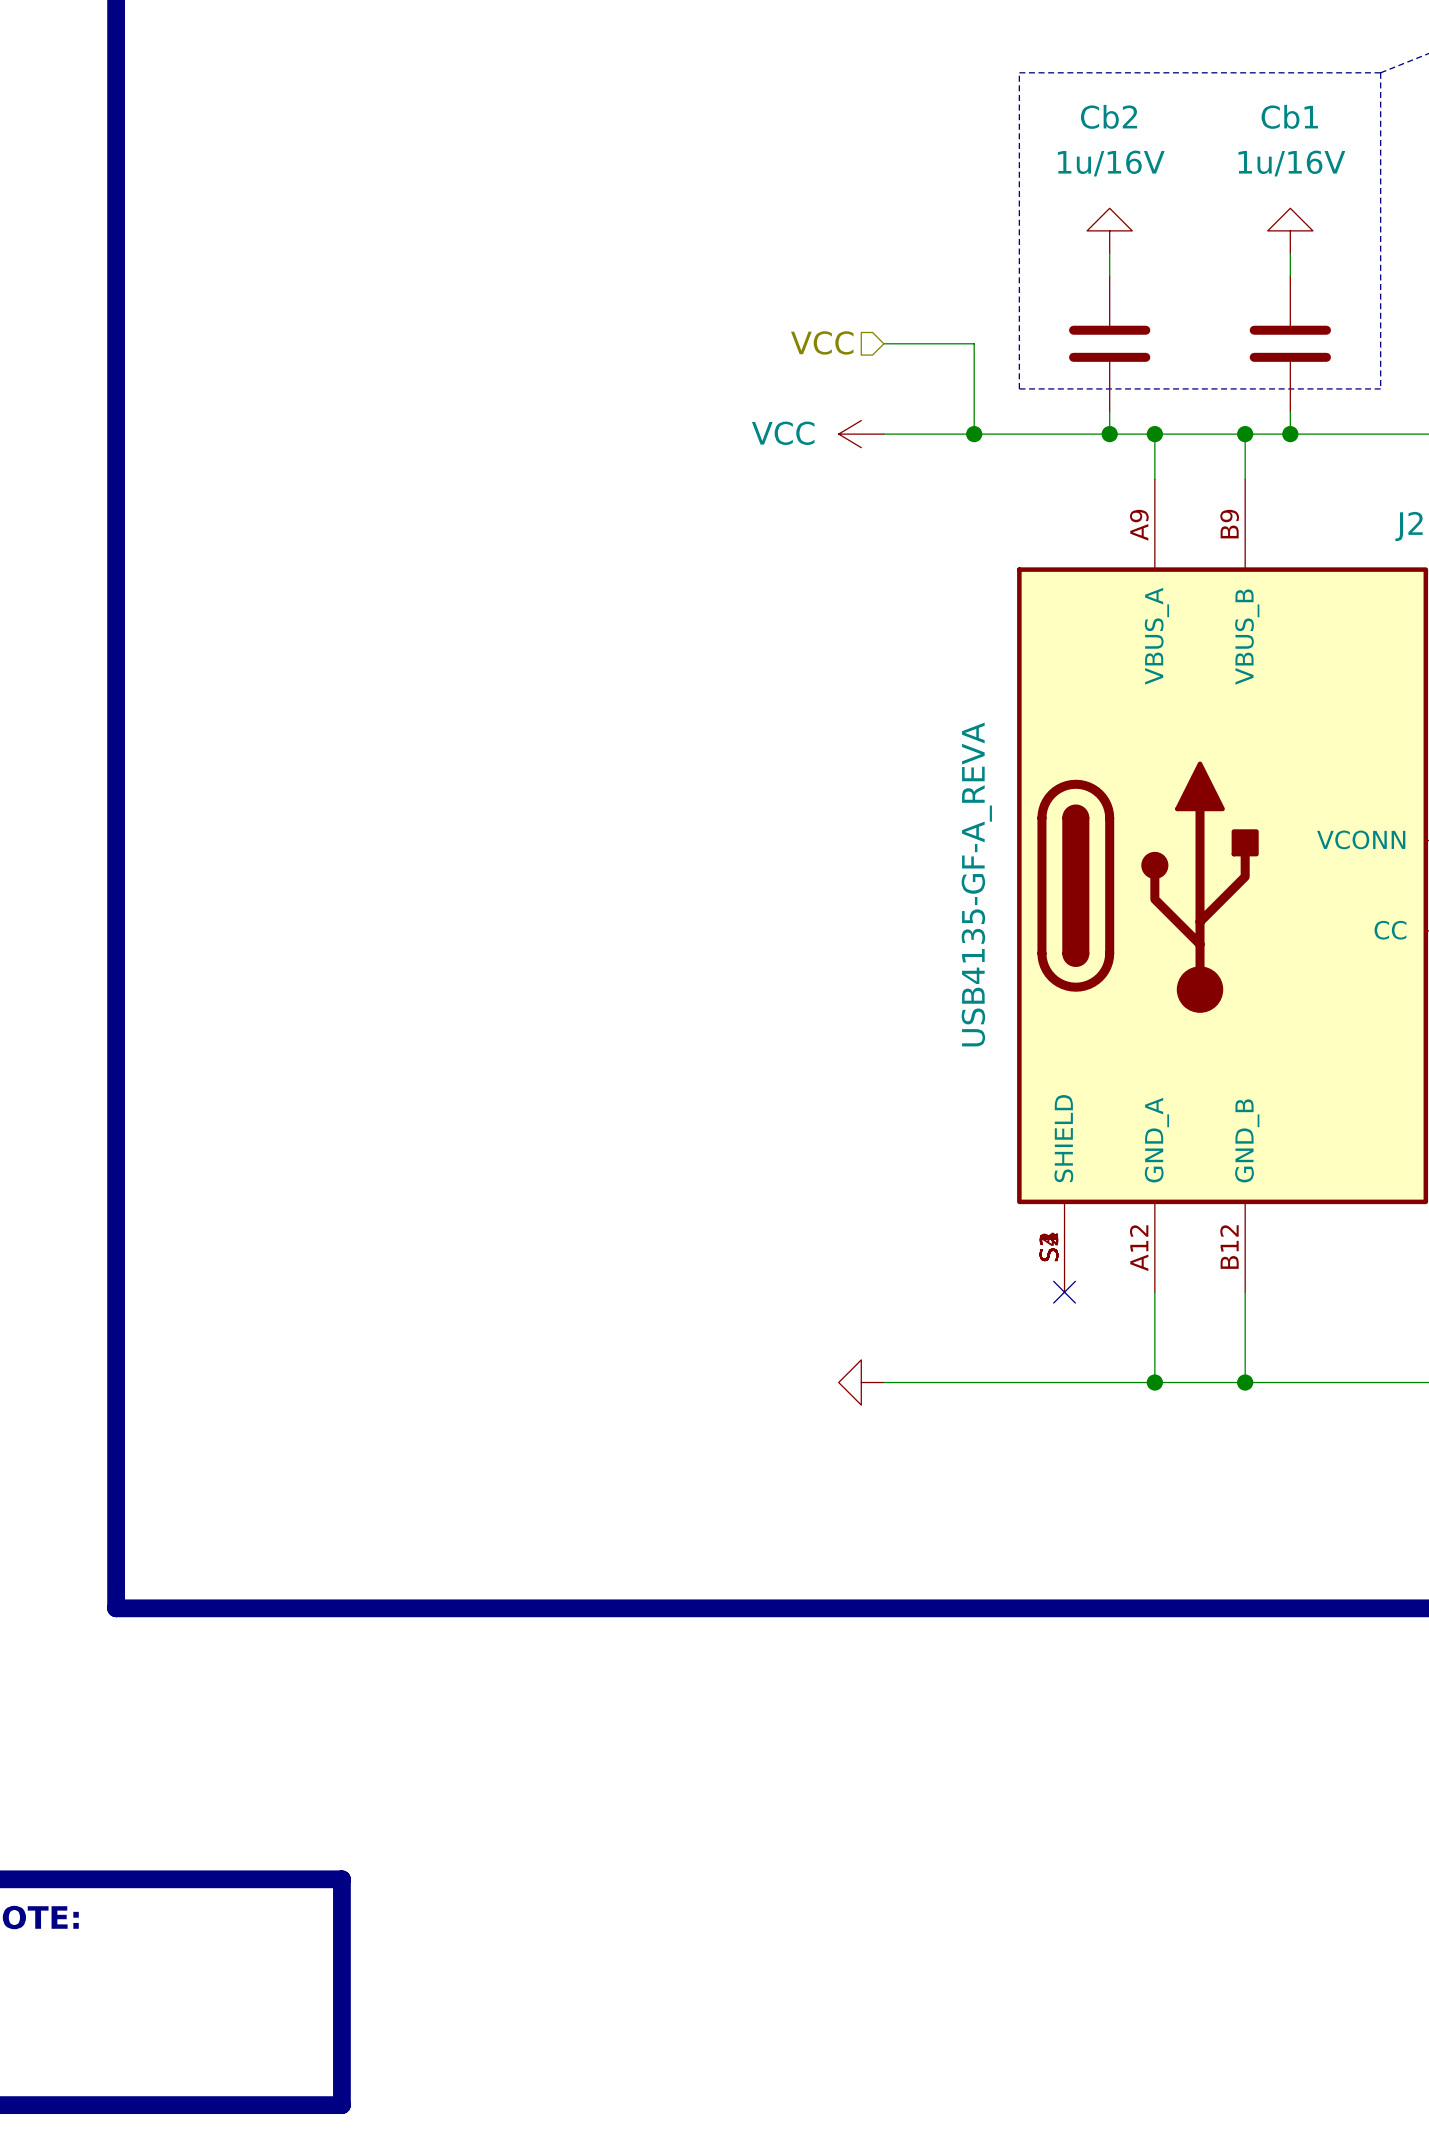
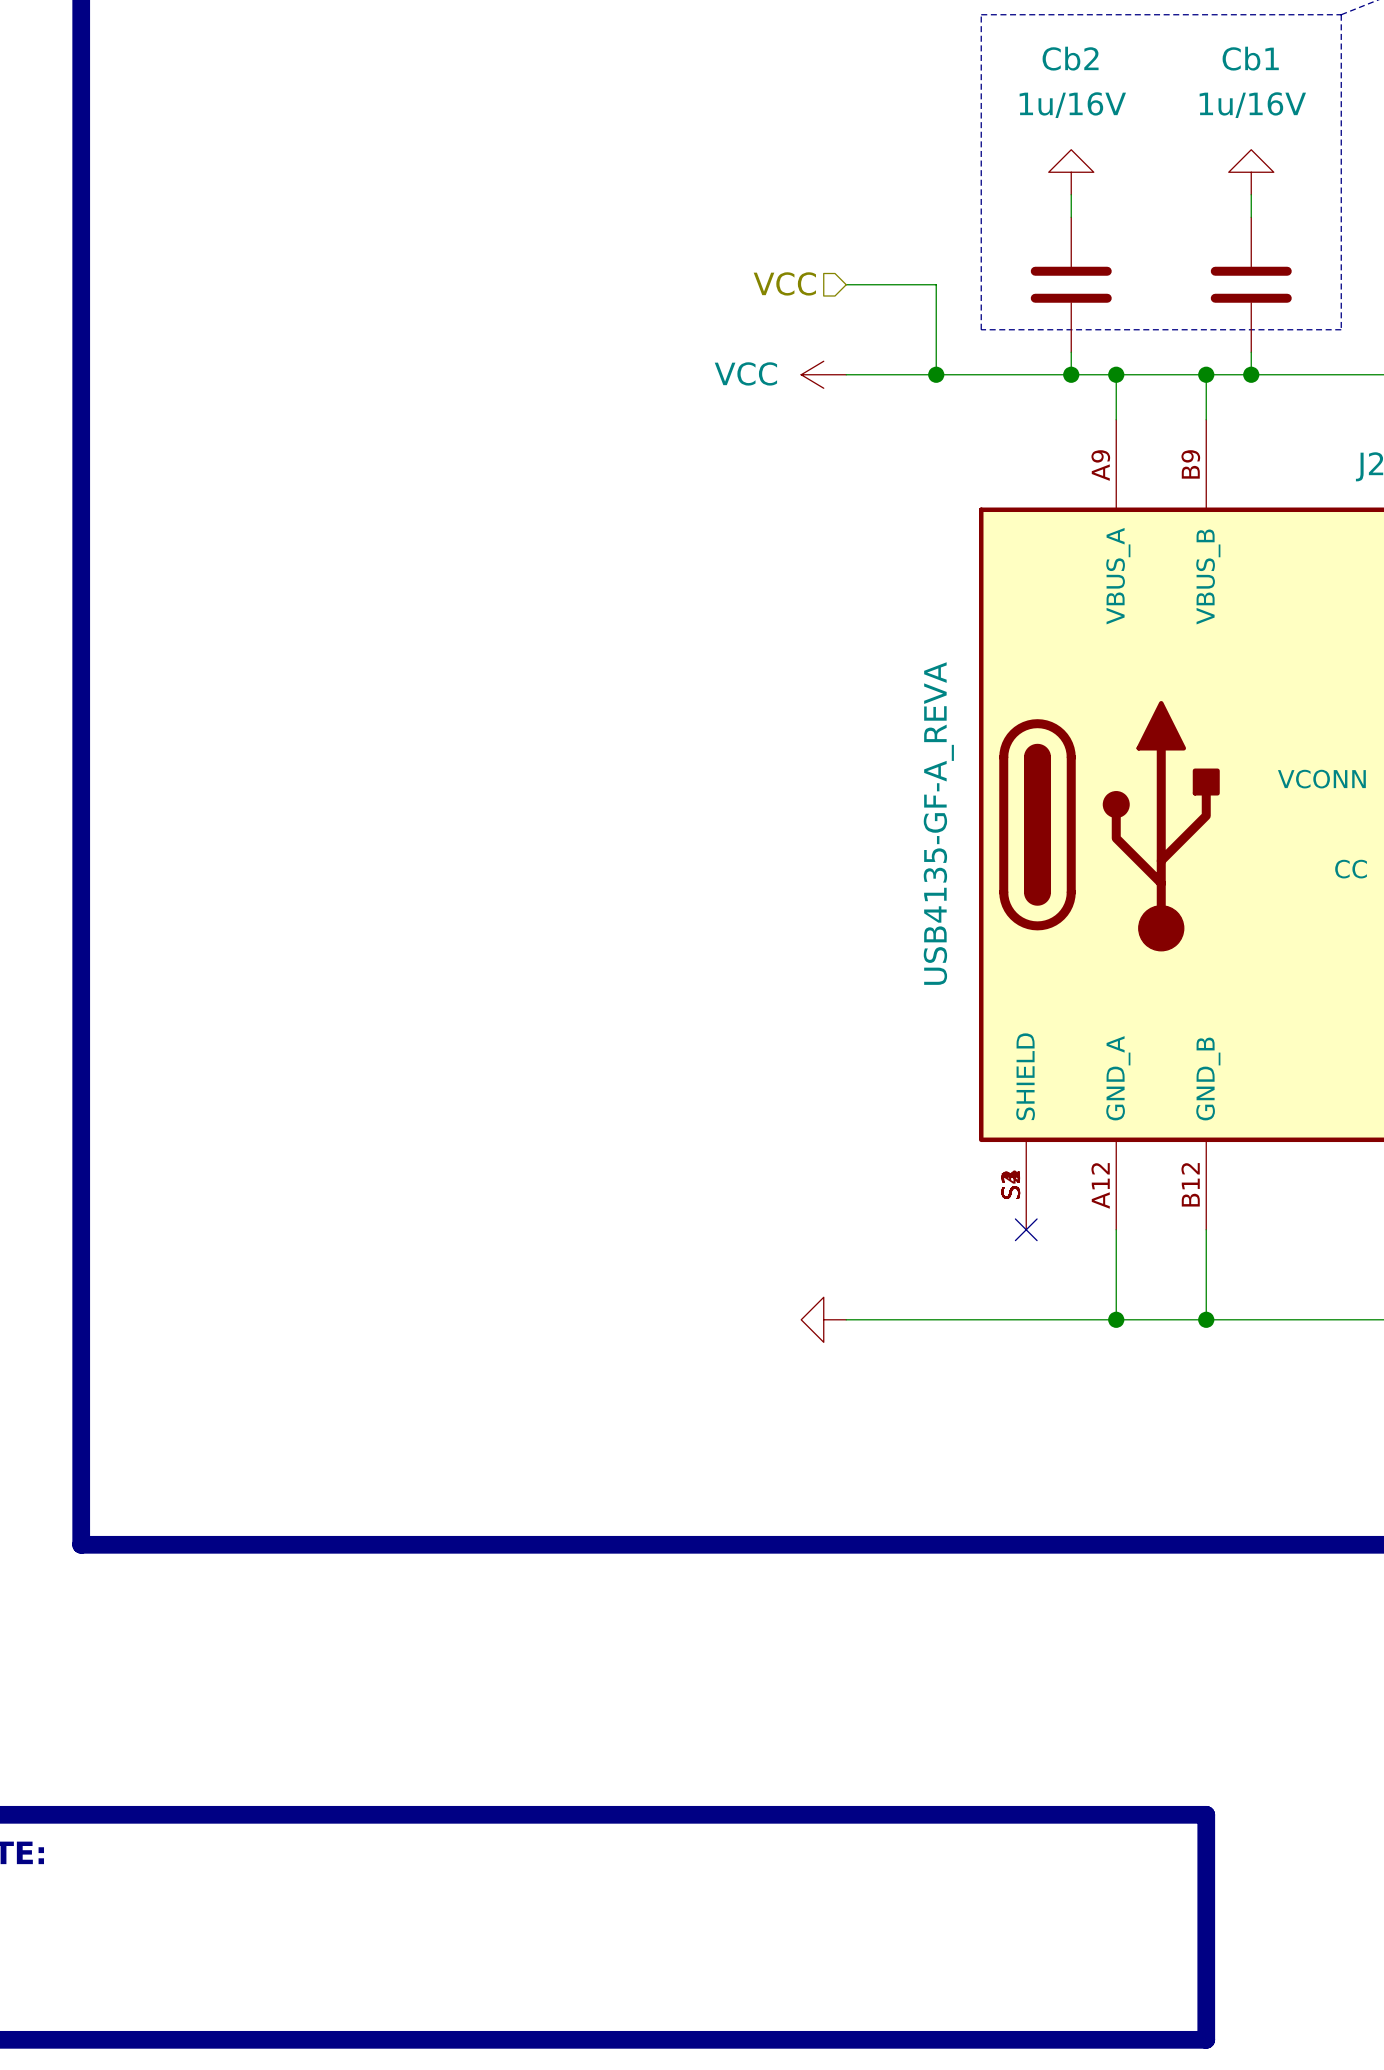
line: (341, 1879) (341, 2105) -> (306, 1814) (1206, 1814) (1206, 2039) (306, 2039)

